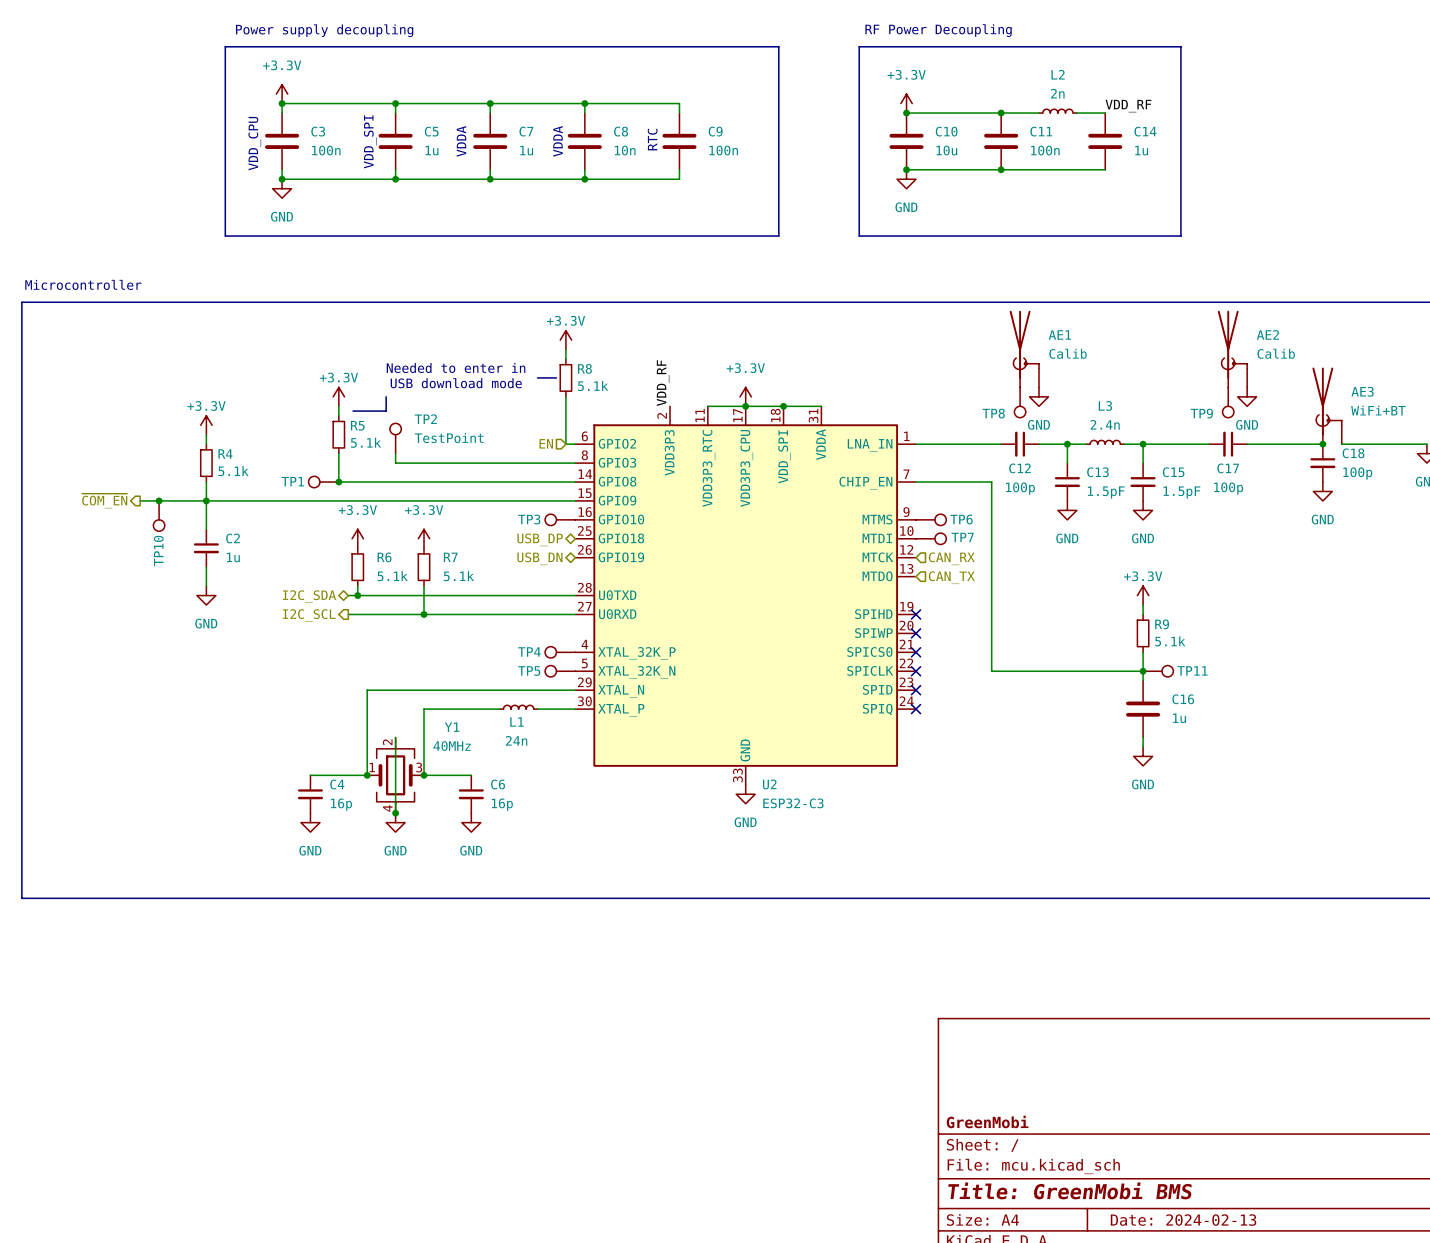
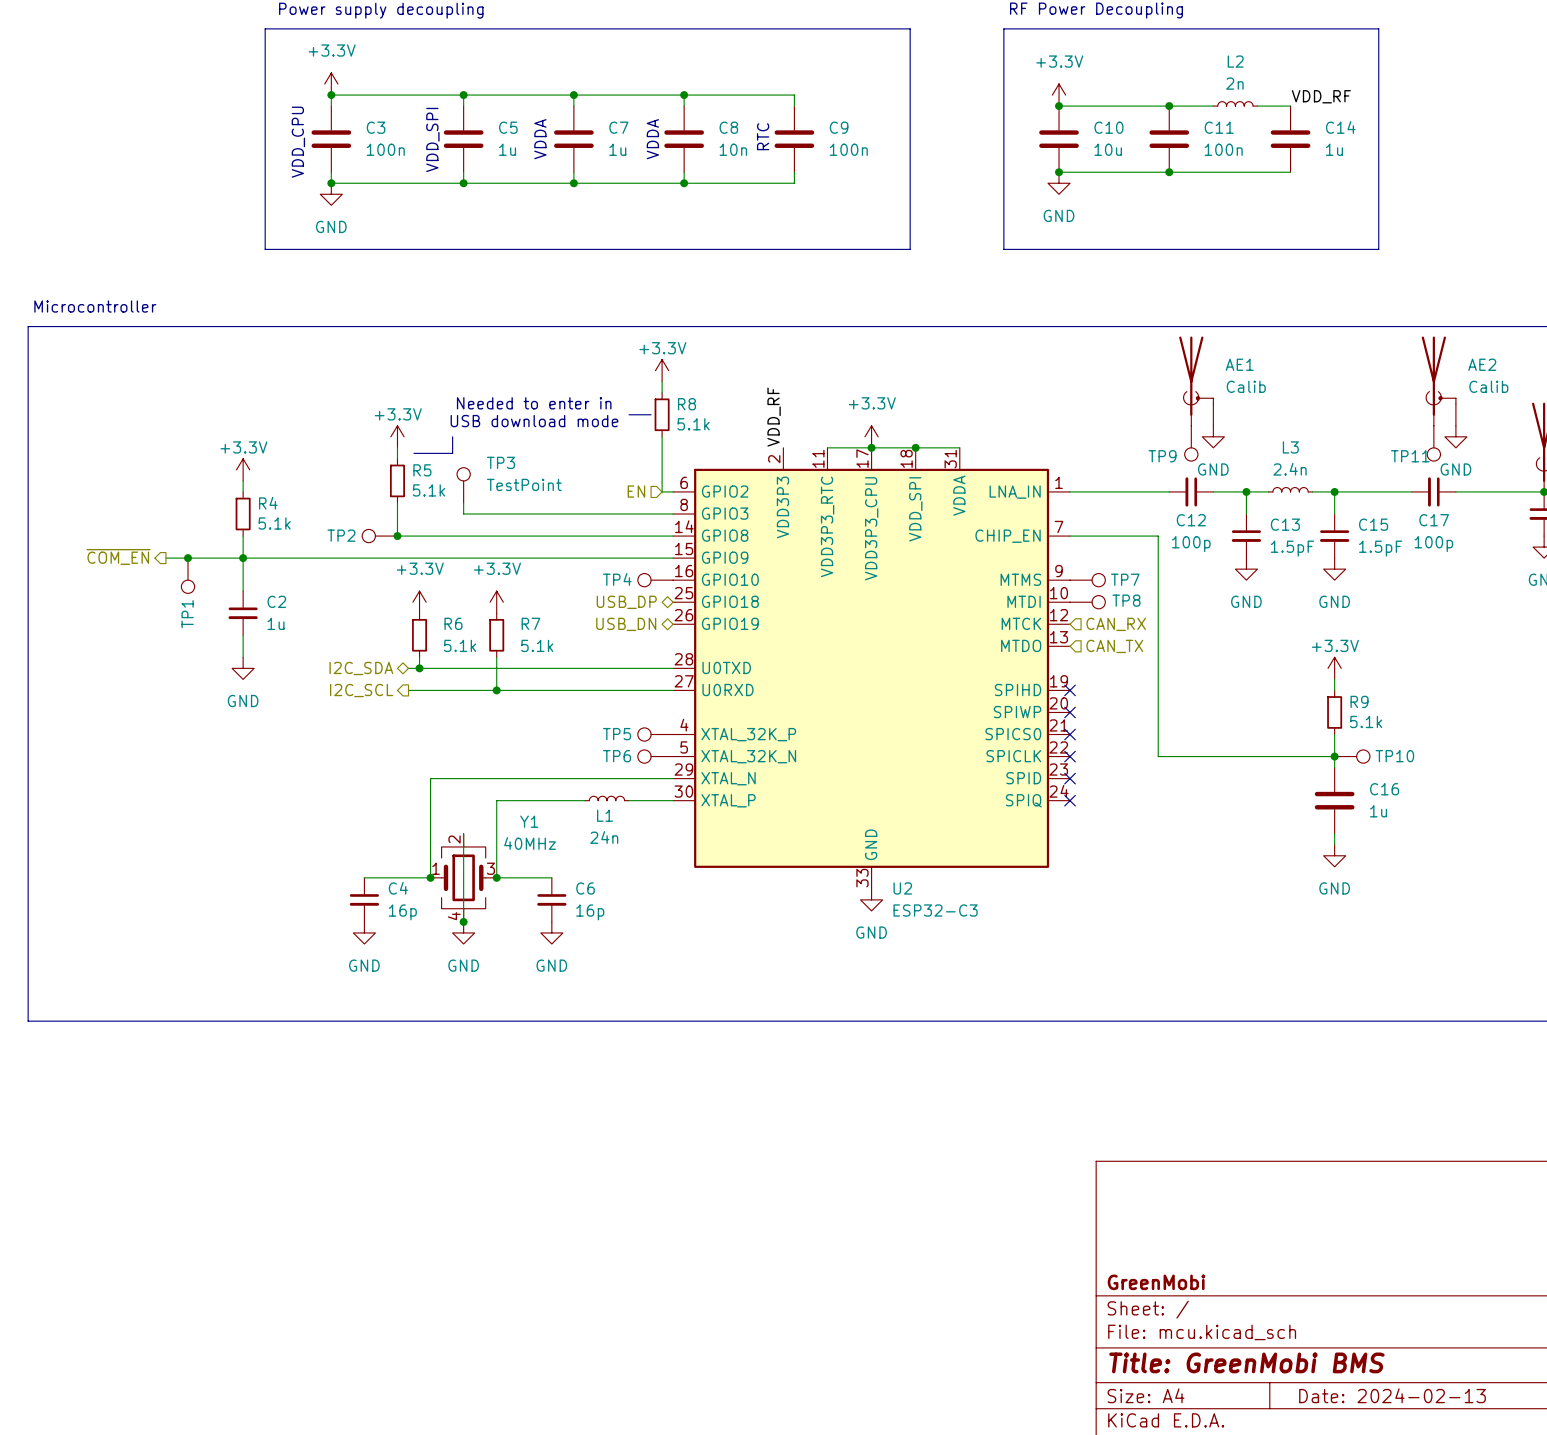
TP8 name: TP8 (993, 413) -> TP9 (1162, 456)
TP9 name: TP9 (1201, 413) -> TP11 (1410, 456)
TP2 name: TP2 (425, 419) -> TP3 (500, 462)
TP1 name: TP1 (292, 481) -> TP2 (341, 535)
TP3 name: TP3 (529, 519) -> TP4 (617, 579)
TP6 name: TP6 (961, 519) -> TP7 (1125, 579)
TP7 name: TP7 (962, 537) -> TP8 (1126, 600)
TP10 name: TP10 (158, 550) -> TP1 (187, 614)
TP4 name: TP4 (529, 651) -> TP5 (617, 734)
TP5 name: TP5 (529, 670) -> TP6 (617, 756)
TP11 name: TP11 (1192, 670) -> TP10 (1394, 756)

